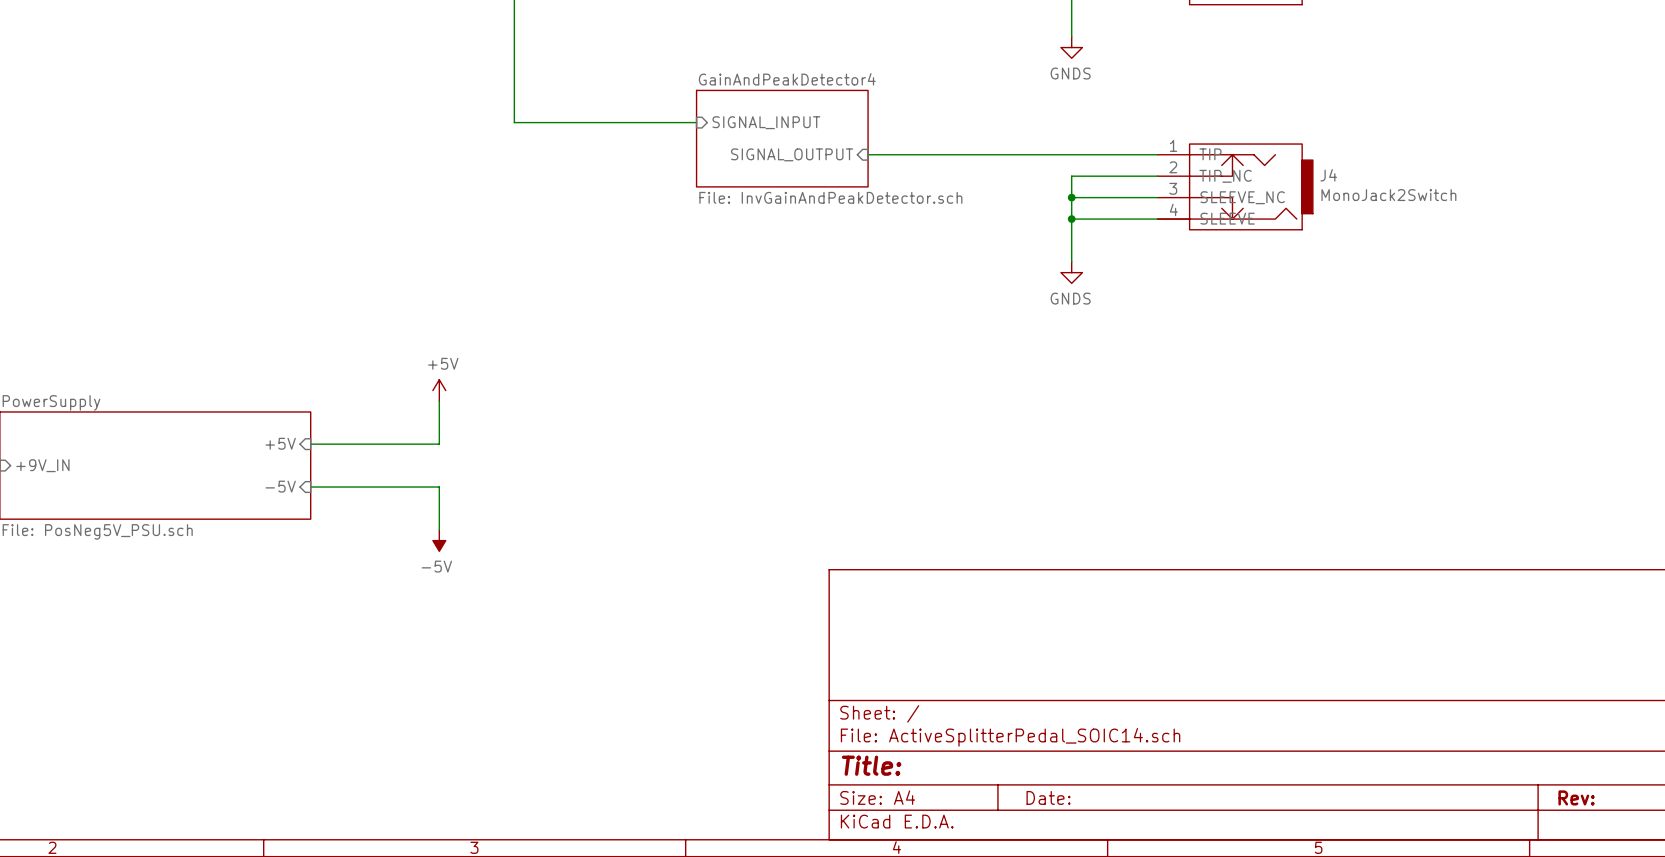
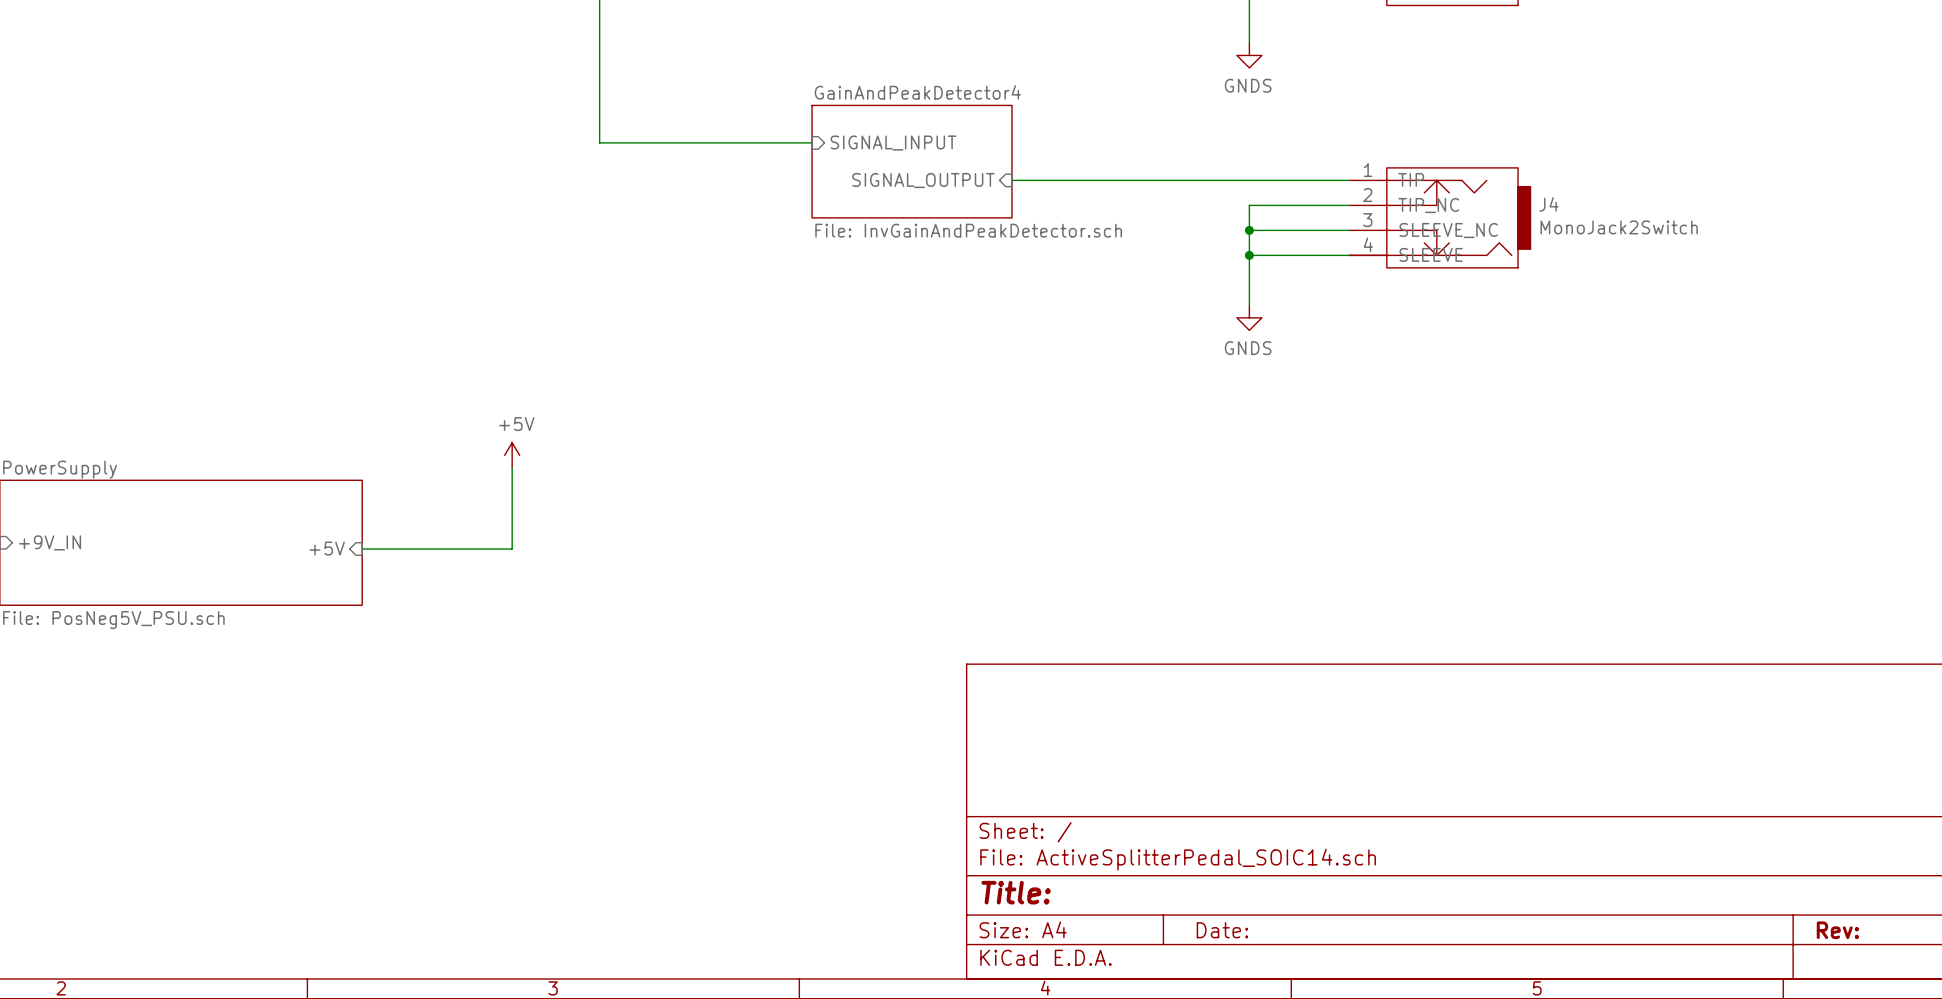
sheet pin position: +5V (280, 443) -> +5V (327, 548)
wire: (310, 444) (439, 444) -> (362, 549) (512, 549) (512, 517)
sheet pin: -5V (280, 486) -> none
wire: (310, 487) (439, 487) (439, 529) -> none
power symbol: -5V (439, 540) -> none

